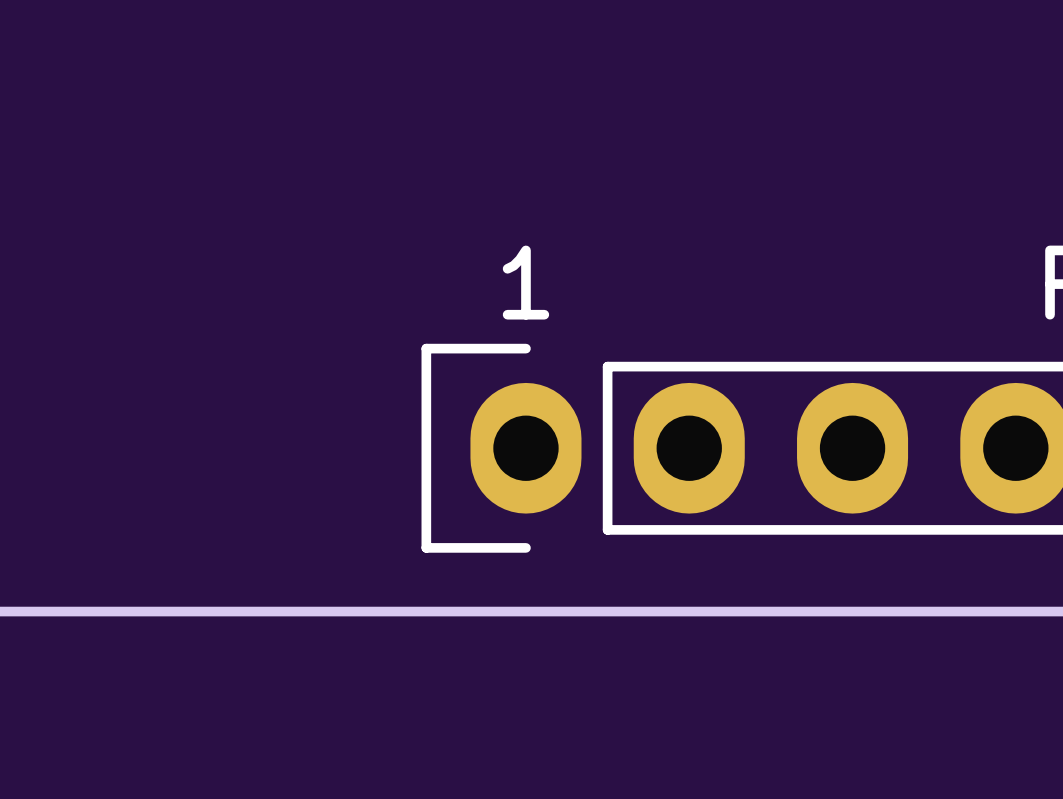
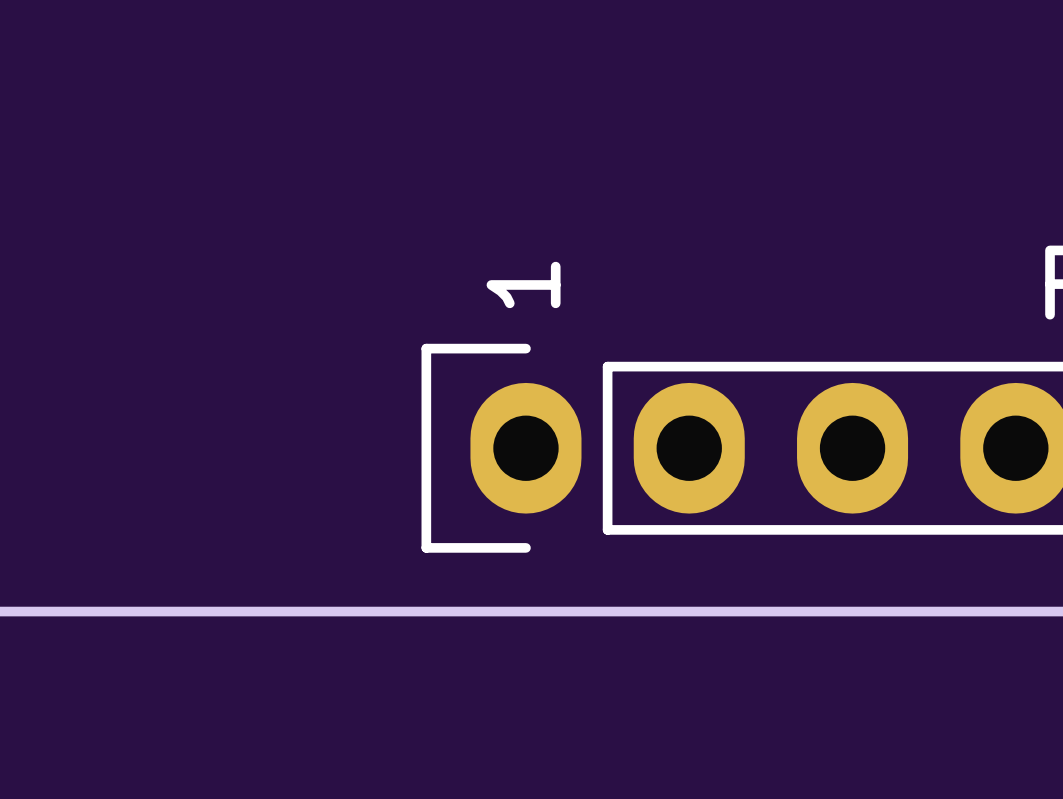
text rotation: 0° (525, 282) -> 90° counterclockwise (523, 284)

